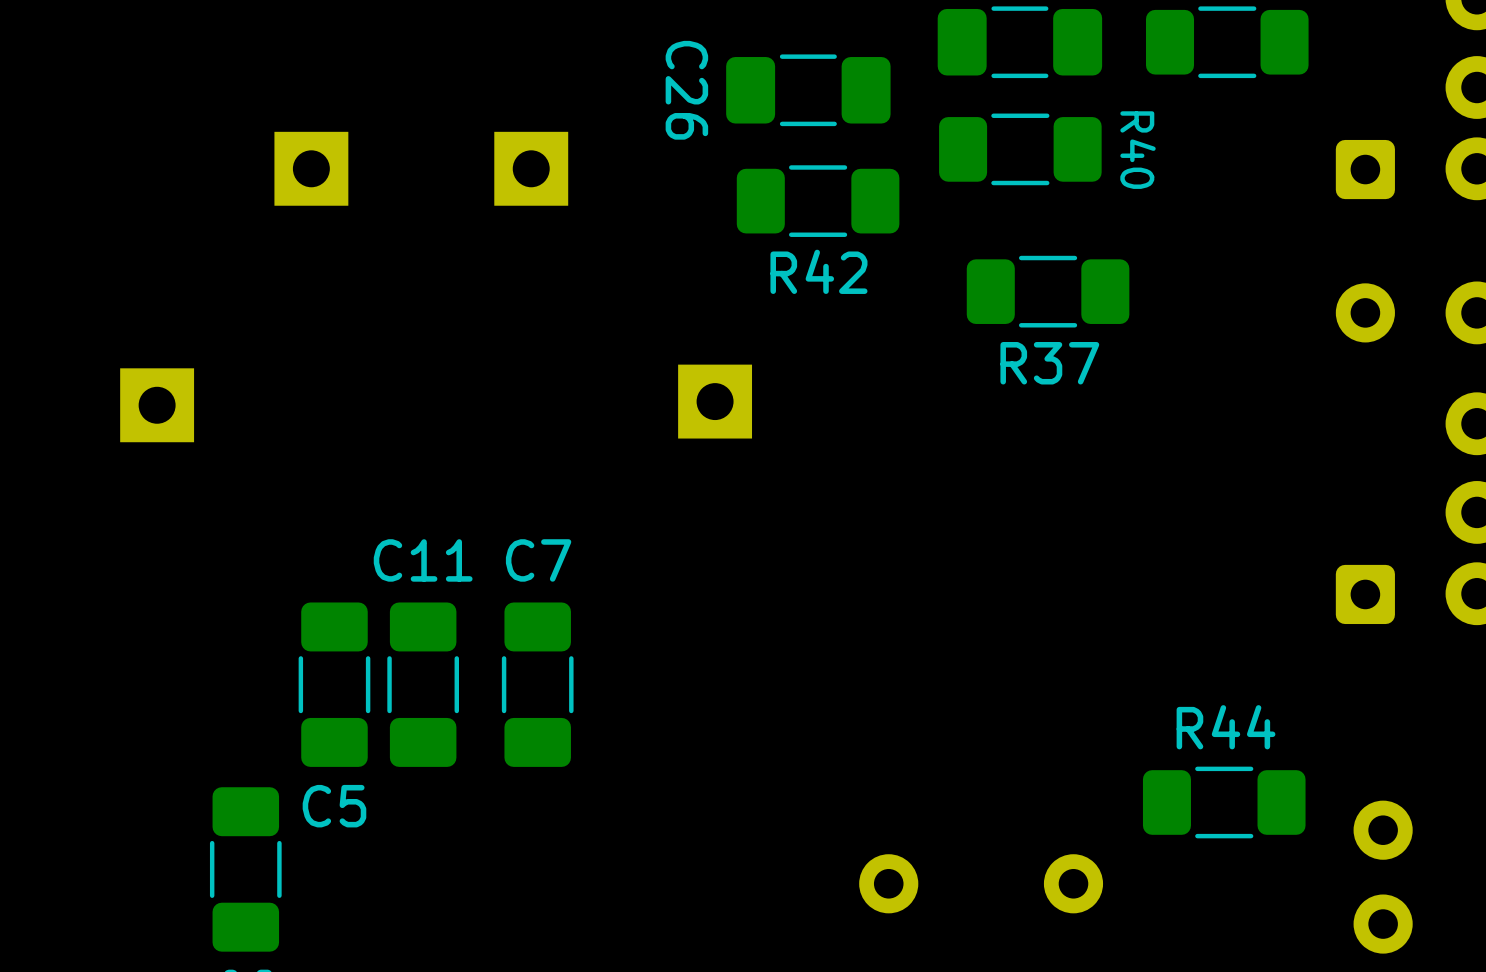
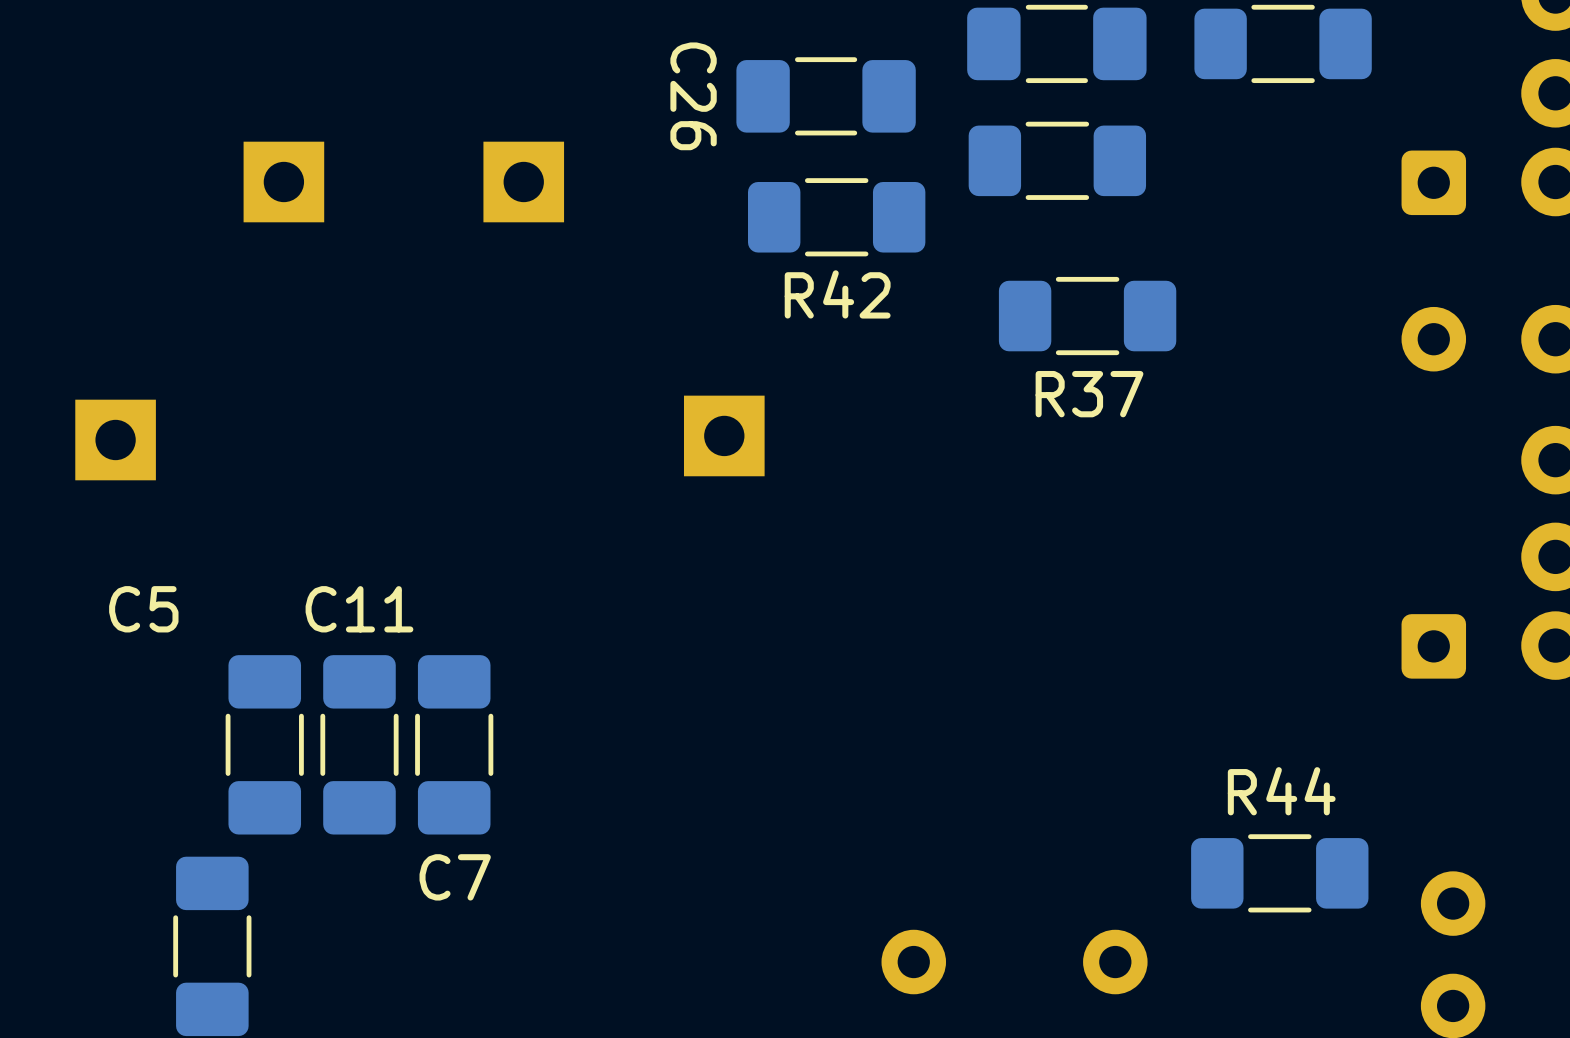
R40 name: R40 (1138, 150) -> none
C7 name position: C7 (538, 560) -> C7 (455, 877)
C5 position: (334, 684) -> (264, 744)
C11 position: (423, 684) -> (359, 744)
C7 position: (537, 684) -> (454, 744)
C5 name position: C5 (334, 806) -> C5 (143, 609)

